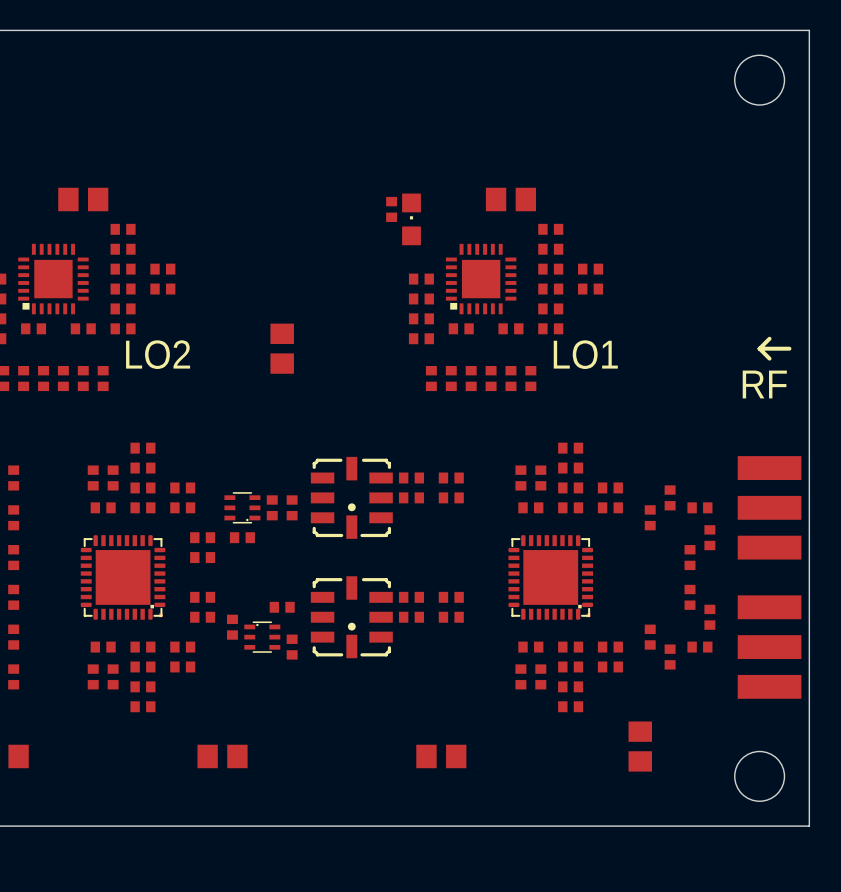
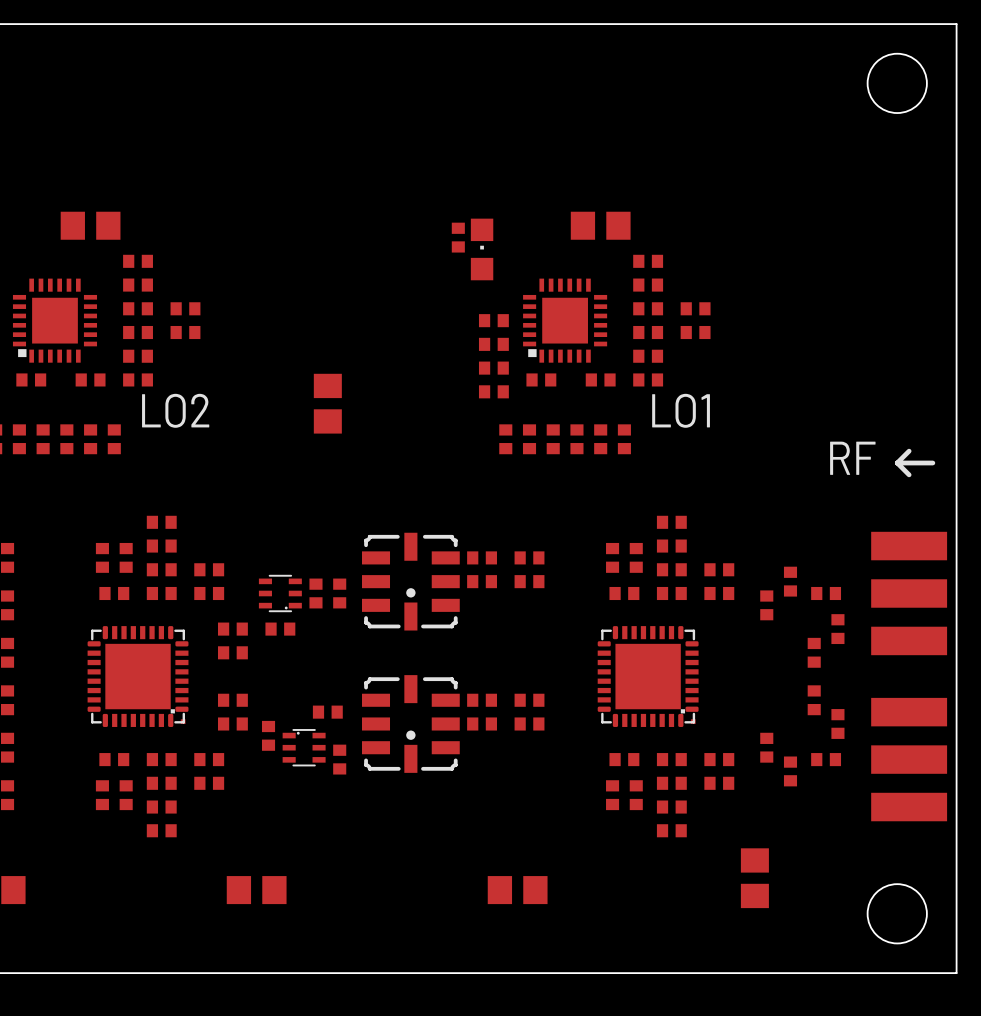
line: (769, 338) (759, 348) -> (909, 451) (897, 463)
line: (759, 348) (769, 358) -> (897, 463) (909, 474)
line: (759, 348) (789, 348) -> (897, 463) (932, 463)
text position: RF (764, 384) -> RF (852, 458)

